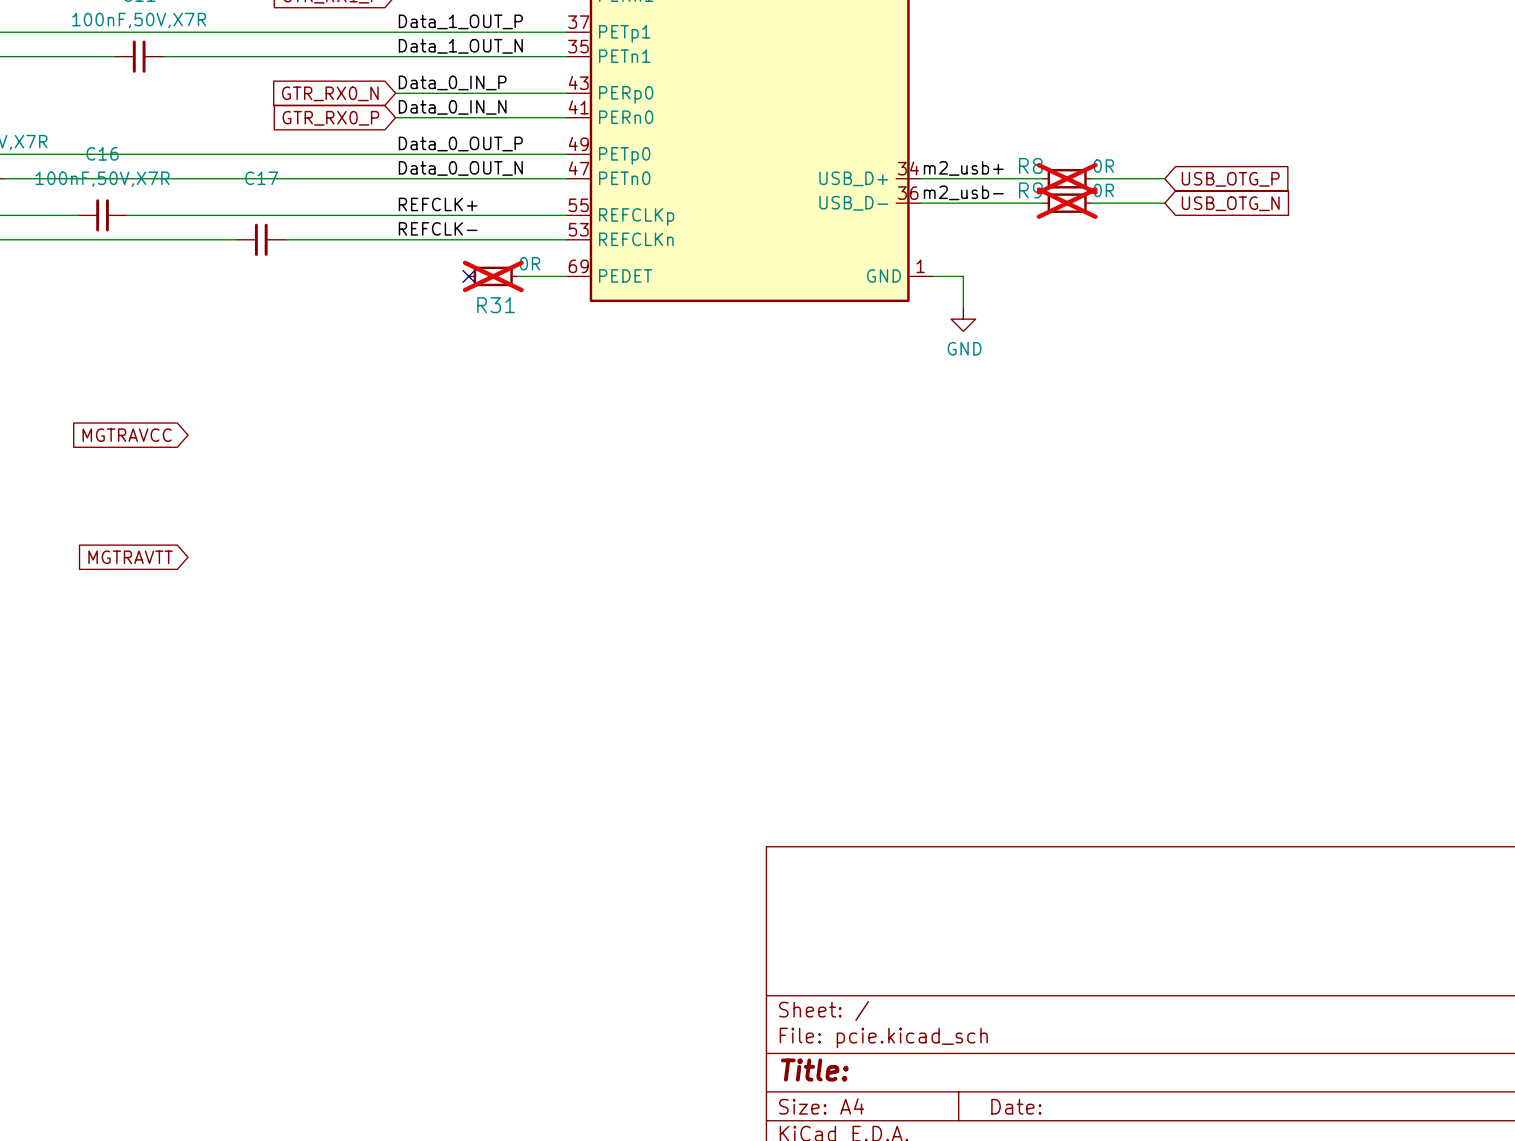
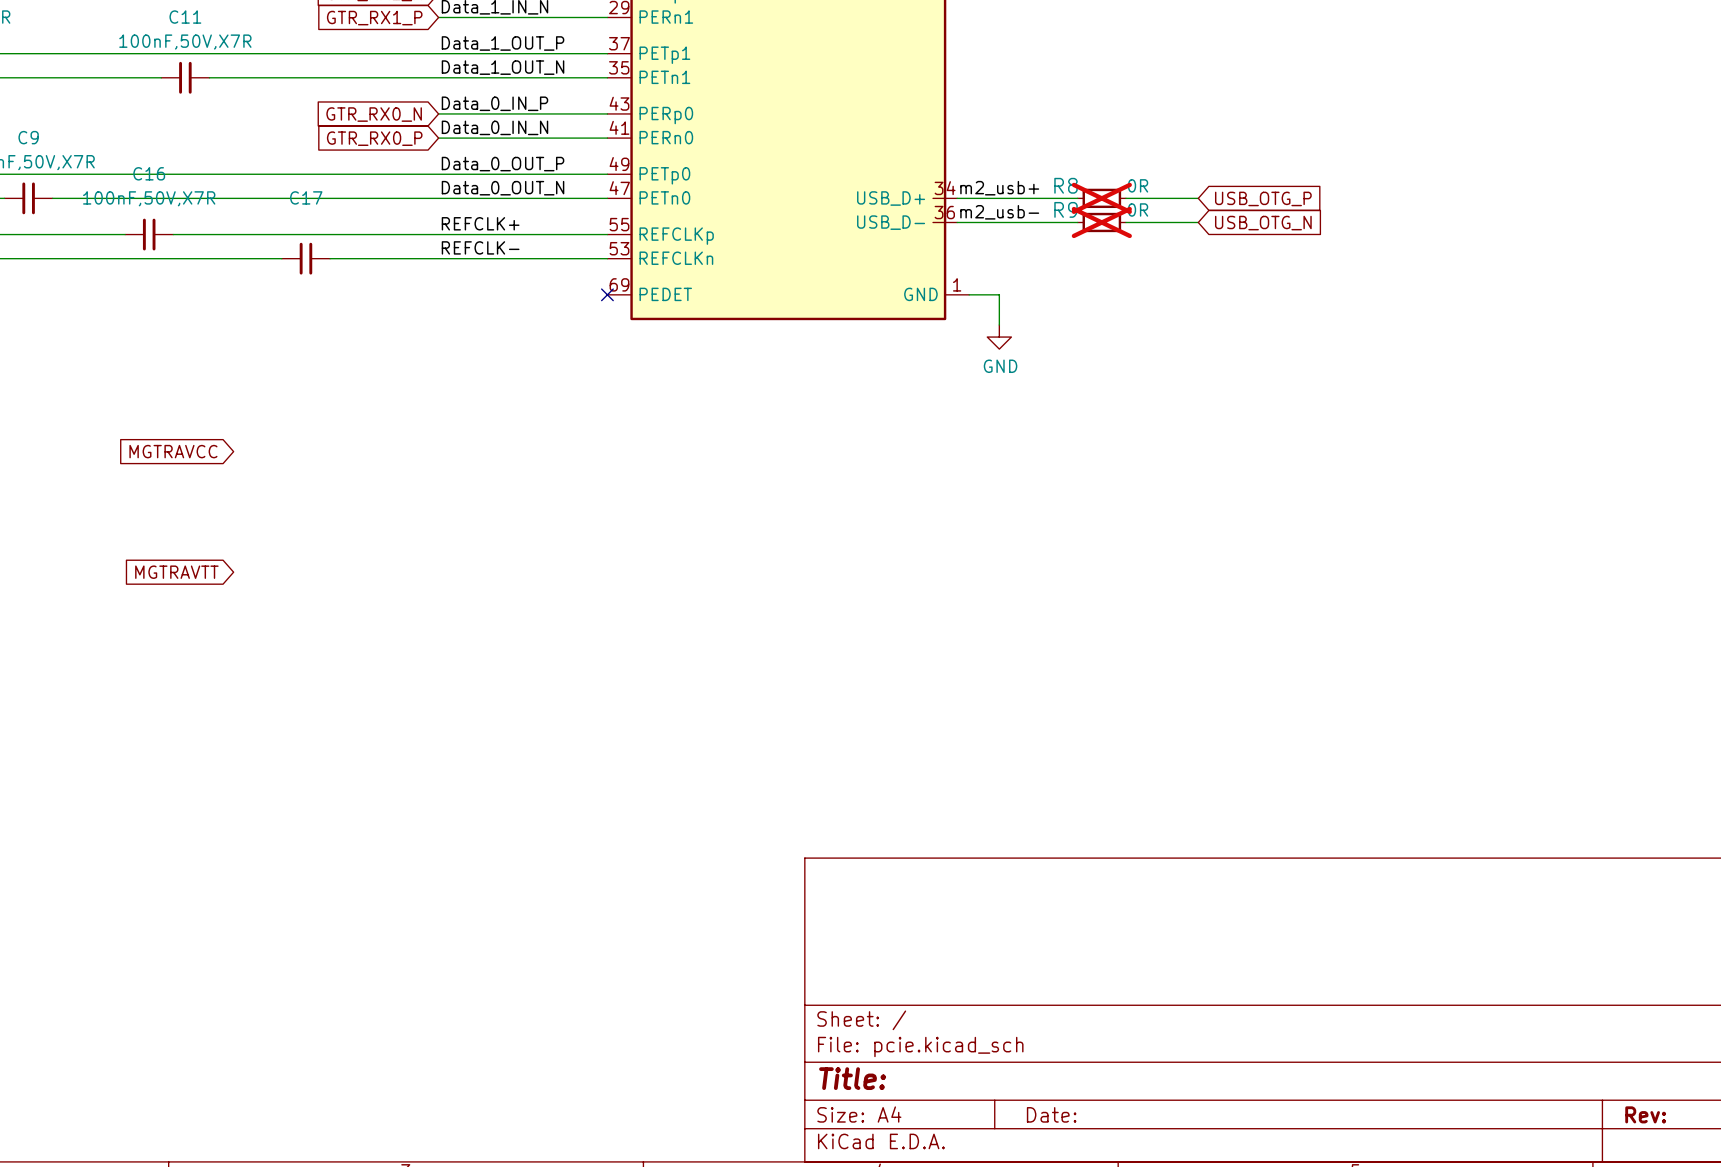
no-connect mark: (468, 276) -> none
R31: (493, 276) -> none
wire: (517, 276) (566, 276) -> none
no-connect mark: none -> (607, 294)

